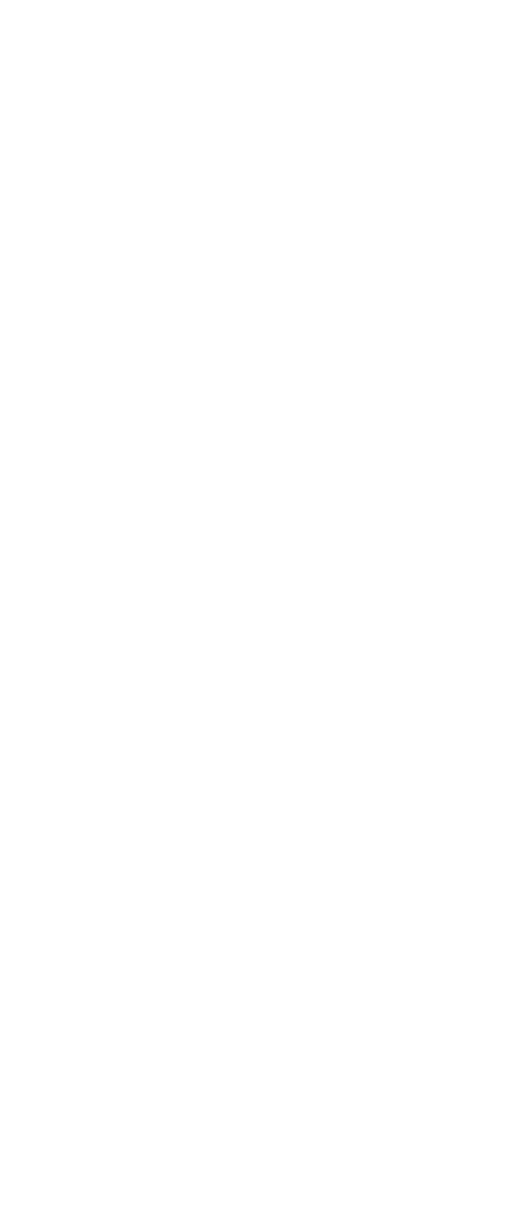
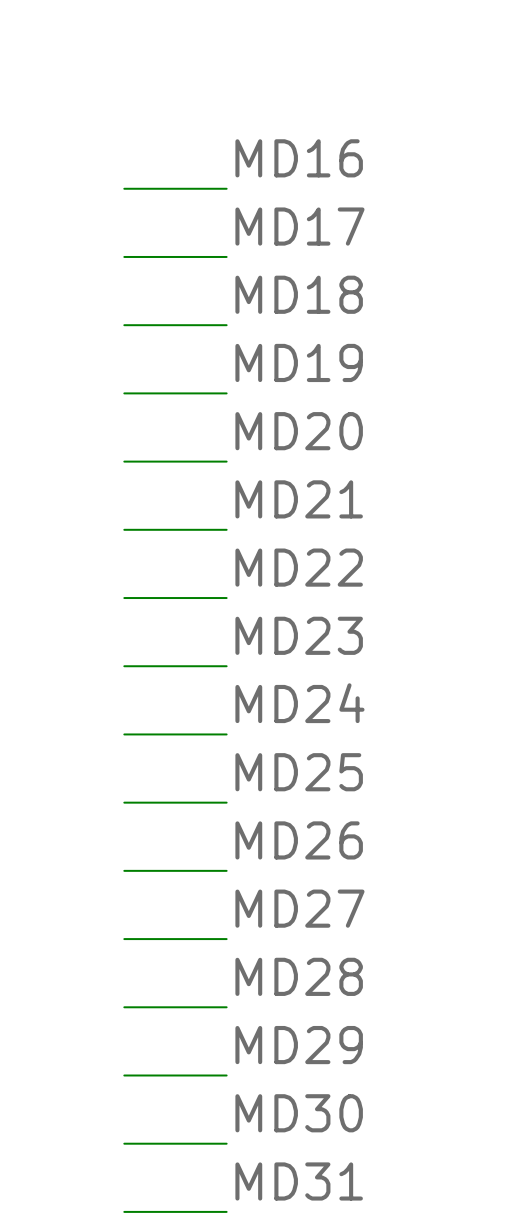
label: none -> MD16 (299, 158)
wire: none -> (124, 188) (226, 188)
label: none -> MD17 (299, 226)
wire: none -> (124, 256) (226, 256)
label: none -> MD18 (299, 294)
wire: none -> (124, 325) (226, 325)
label: none -> MD19 (299, 362)
wire: none -> (124, 393) (226, 393)
label: none -> MD20 (299, 431)
wire: none -> (124, 461) (226, 461)
label: none -> MD21 (299, 499)
wire: none -> (124, 529) (226, 529)
label: none -> MD22 (299, 567)
wire: none -> (124, 598) (226, 598)
label: none -> MD23 (299, 635)
wire: none -> (124, 666) (226, 666)
label: none -> MD24 (299, 703)
wire: none -> (124, 734) (226, 734)
label: none -> MD25 (299, 772)
wire: none -> (124, 802) (226, 802)
label: none -> MD26 (299, 840)
wire: none -> (124, 870) (226, 870)
label: none -> MD27 (299, 908)
wire: none -> (124, 939) (226, 939)
label: none -> MD28 (299, 976)
wire: none -> (124, 1007) (226, 1007)
label: none -> MD29 (299, 1045)
wire: none -> (124, 1075) (226, 1075)
label: none -> MD30 (299, 1113)
wire: none -> (124, 1143) (226, 1143)
label: none -> MD31 (299, 1181)
wire: none -> (124, 1211) (226, 1211)

